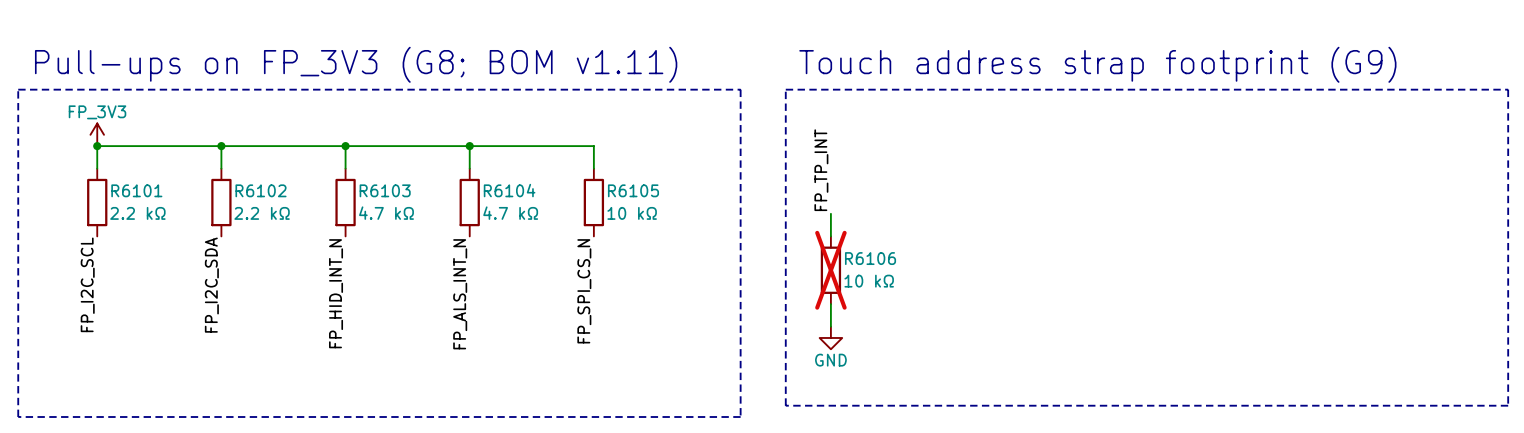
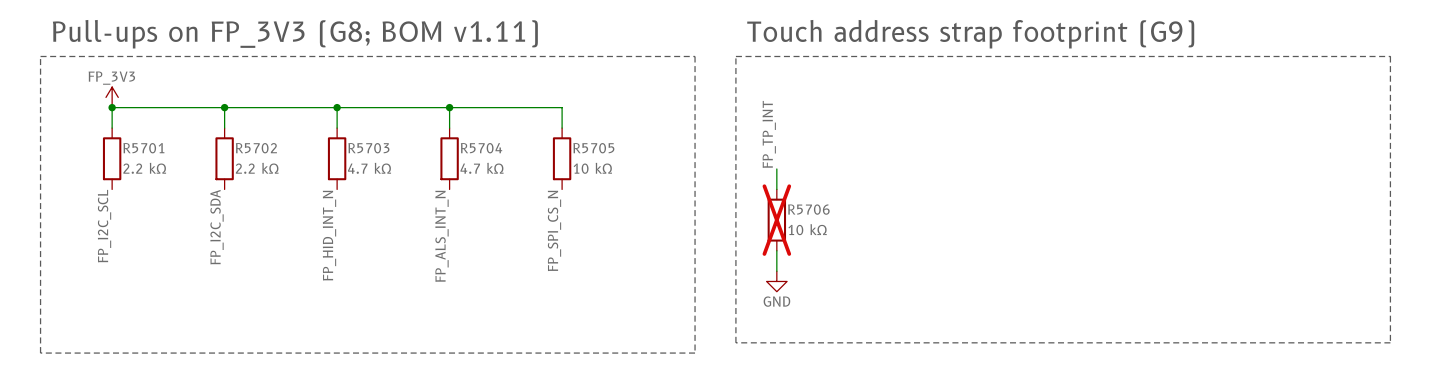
R6101 name: R6101 (136, 190) -> R5701 (143, 148)
R6102 name: R6102 (260, 190) -> R5702 (256, 148)
R6103 name: R6103 (385, 190) -> R5703 (368, 148)
R6104 name: R6104 (509, 190) -> R5704 (481, 148)
R6105 name: R6105 (633, 190) -> R5705 (593, 148)
R6106 name: R6106 (870, 258) -> R5706 (808, 209)

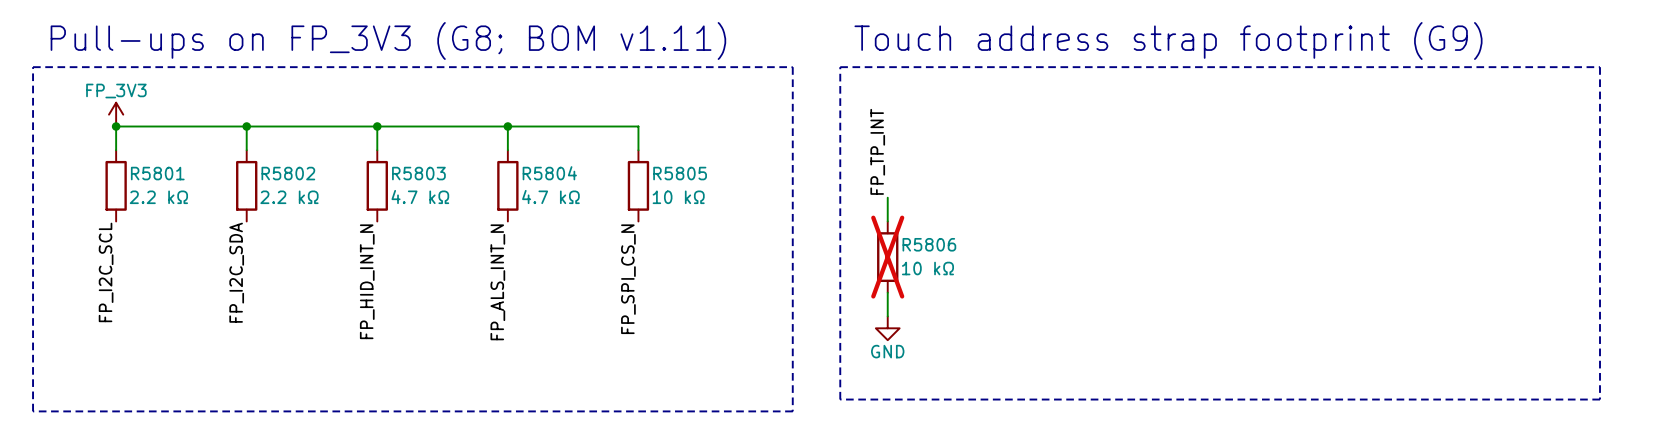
R5701 name: R5701 (143, 148) -> R5801 (157, 173)
R5702 name: R5702 (256, 148) -> R5802 (288, 173)
R5703 name: R5703 (368, 148) -> R5803 (418, 173)
R5704 name: R5704 (481, 148) -> R5804 (549, 173)
R5705 name: R5705 (593, 148) -> R5805 (680, 173)
R5706 name: R5706 (808, 209) -> R5806 (929, 244)

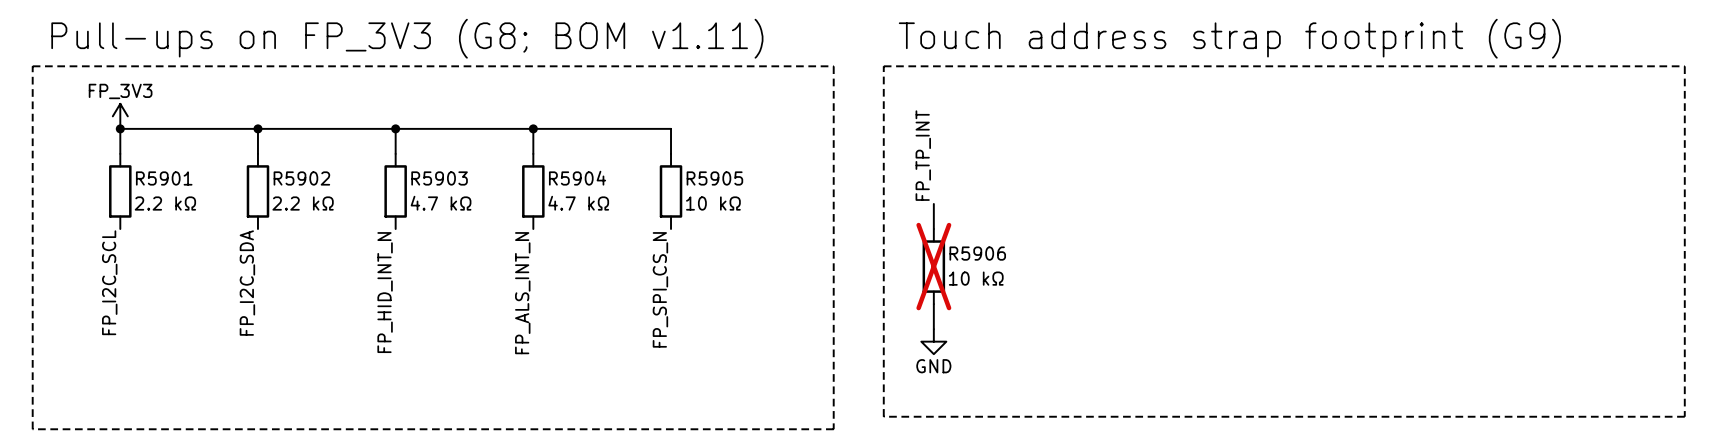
R5801 name: R5801 (157, 173) -> R5901 (164, 178)
R5802 name: R5802 (288, 173) -> R5902 (301, 178)
R5803 name: R5803 (418, 173) -> R5903 (439, 178)
R5804 name: R5804 (549, 173) -> R5904 (577, 178)
R5805 name: R5805 (680, 173) -> R5905 (714, 178)
R5806 name: R5806 (929, 244) -> R5906 (977, 253)

